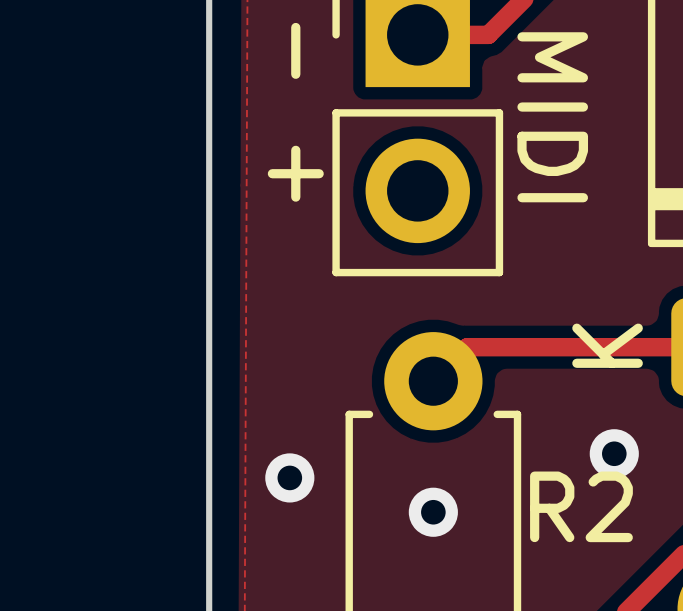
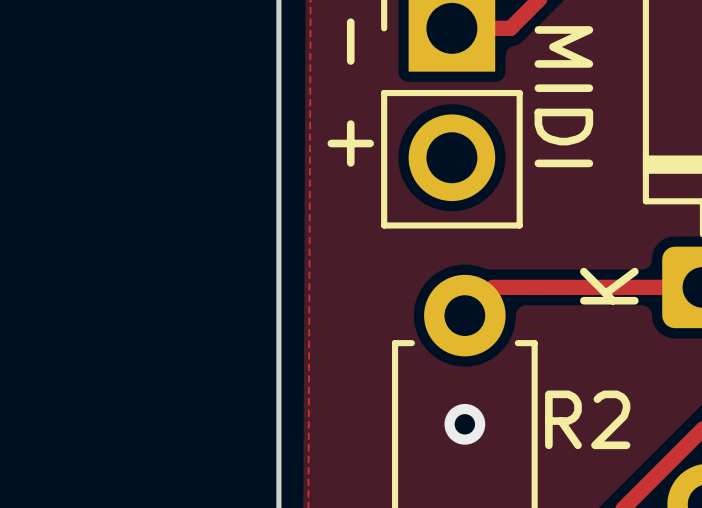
via: (614, 453) -> none
via: (289, 477) -> none

